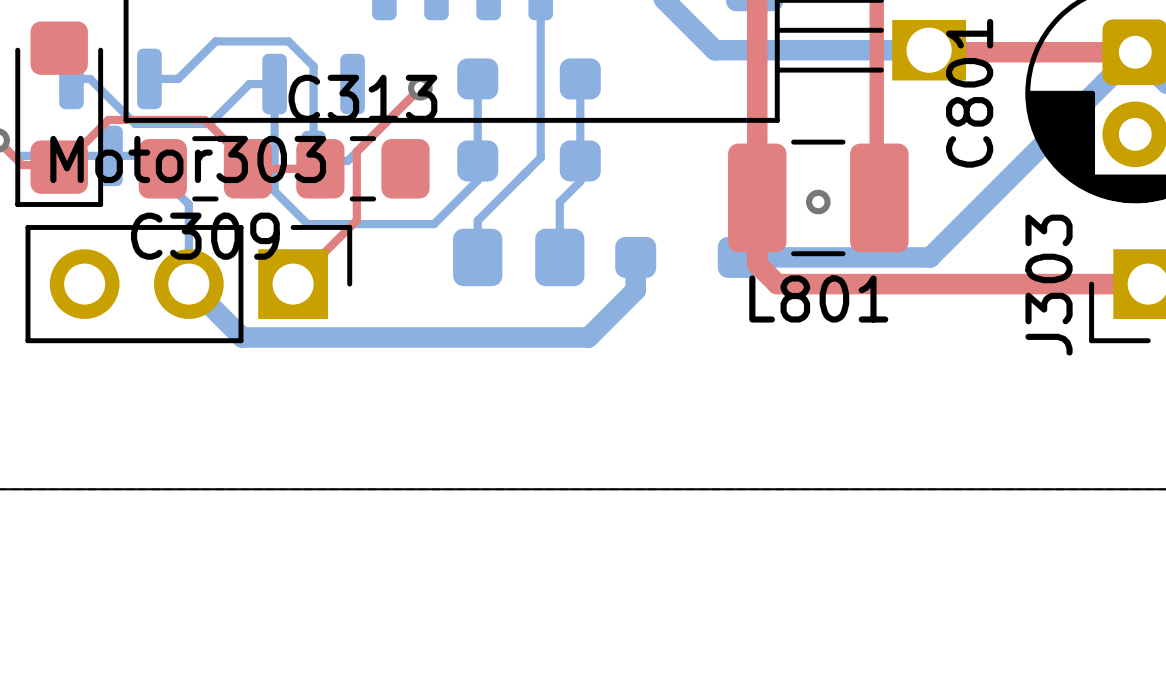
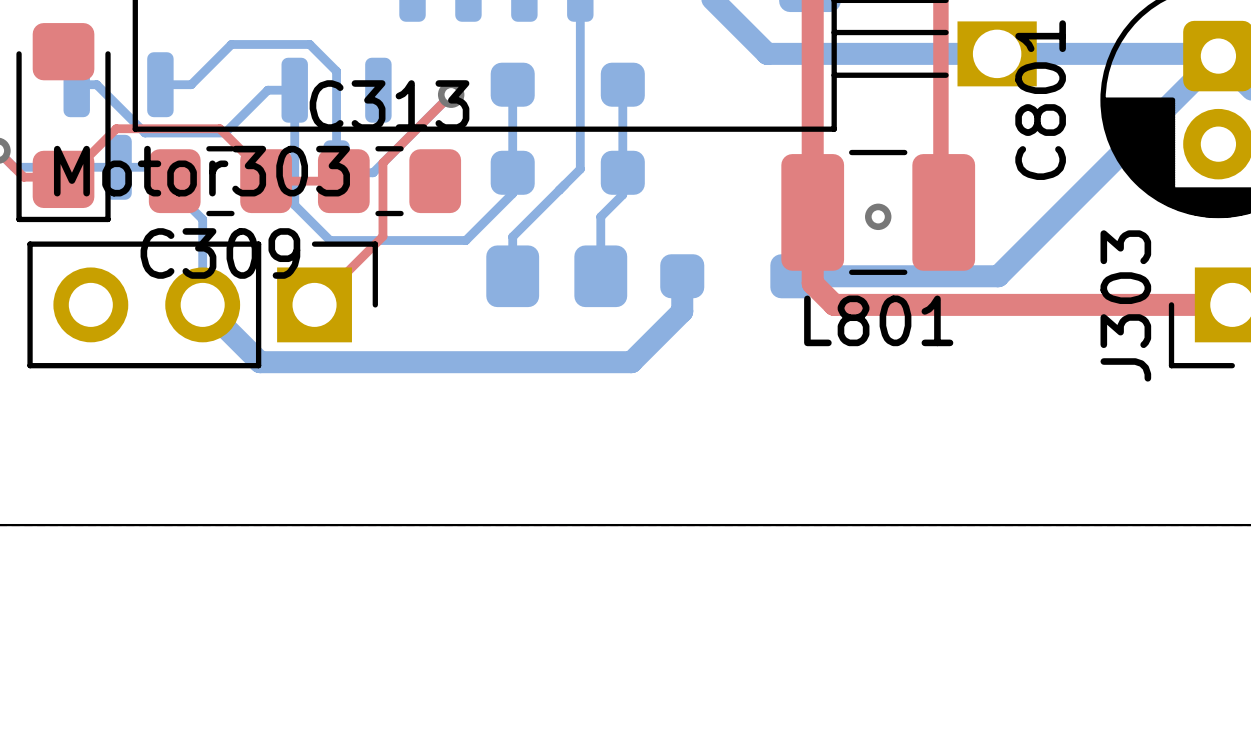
bottom track: none -> (997, 53) (1216, 53) (1218, 56)
top track: (931, 52) (1135, 52) -> none

